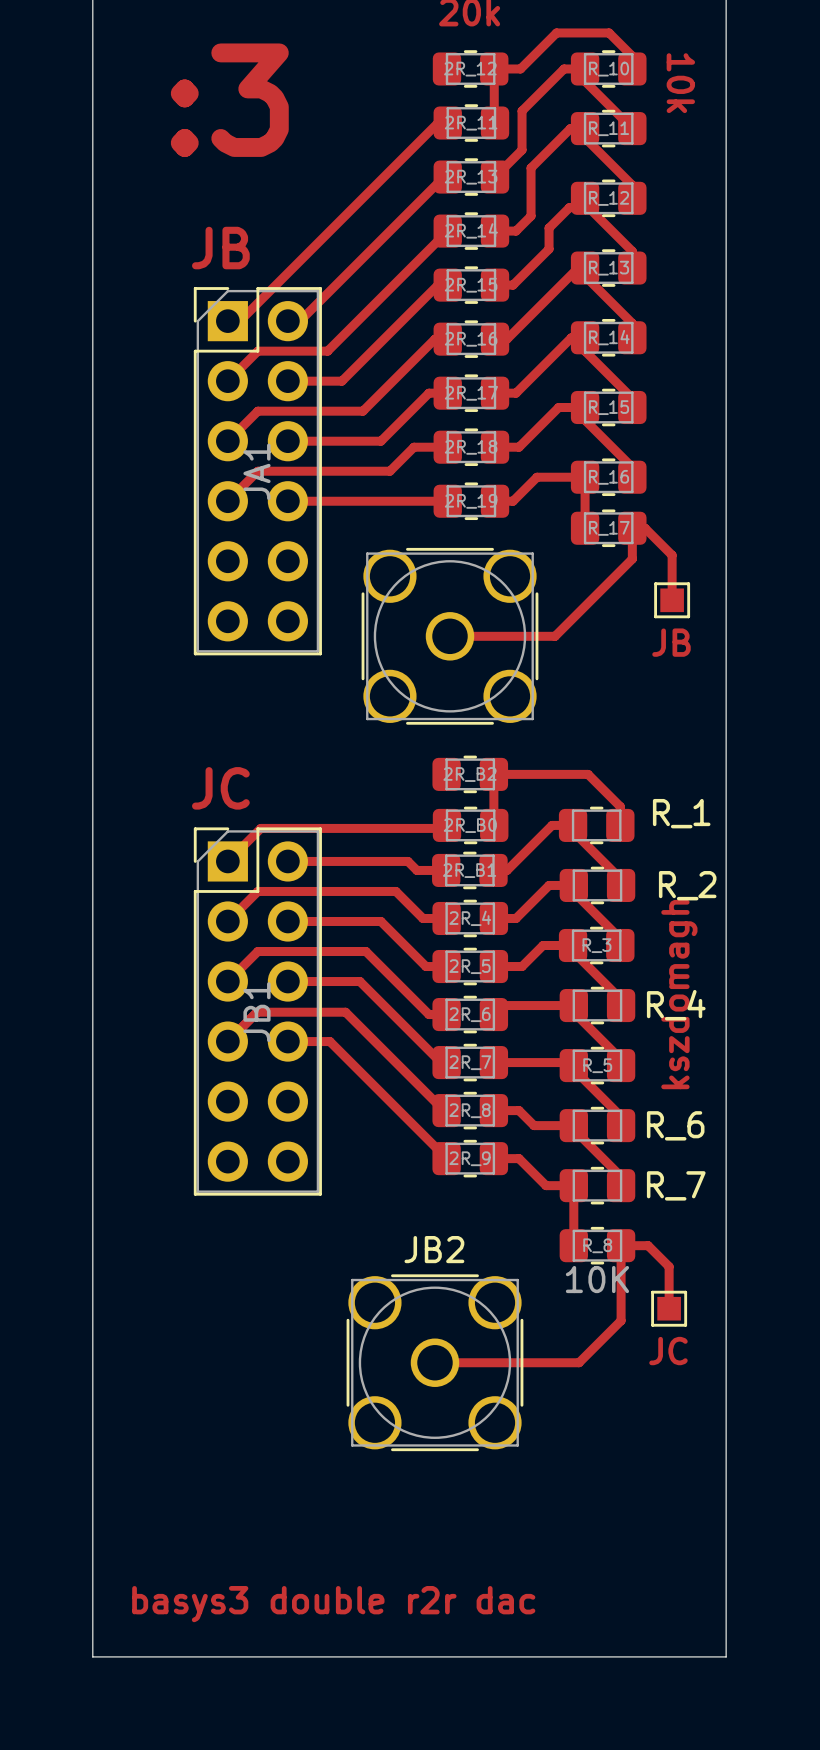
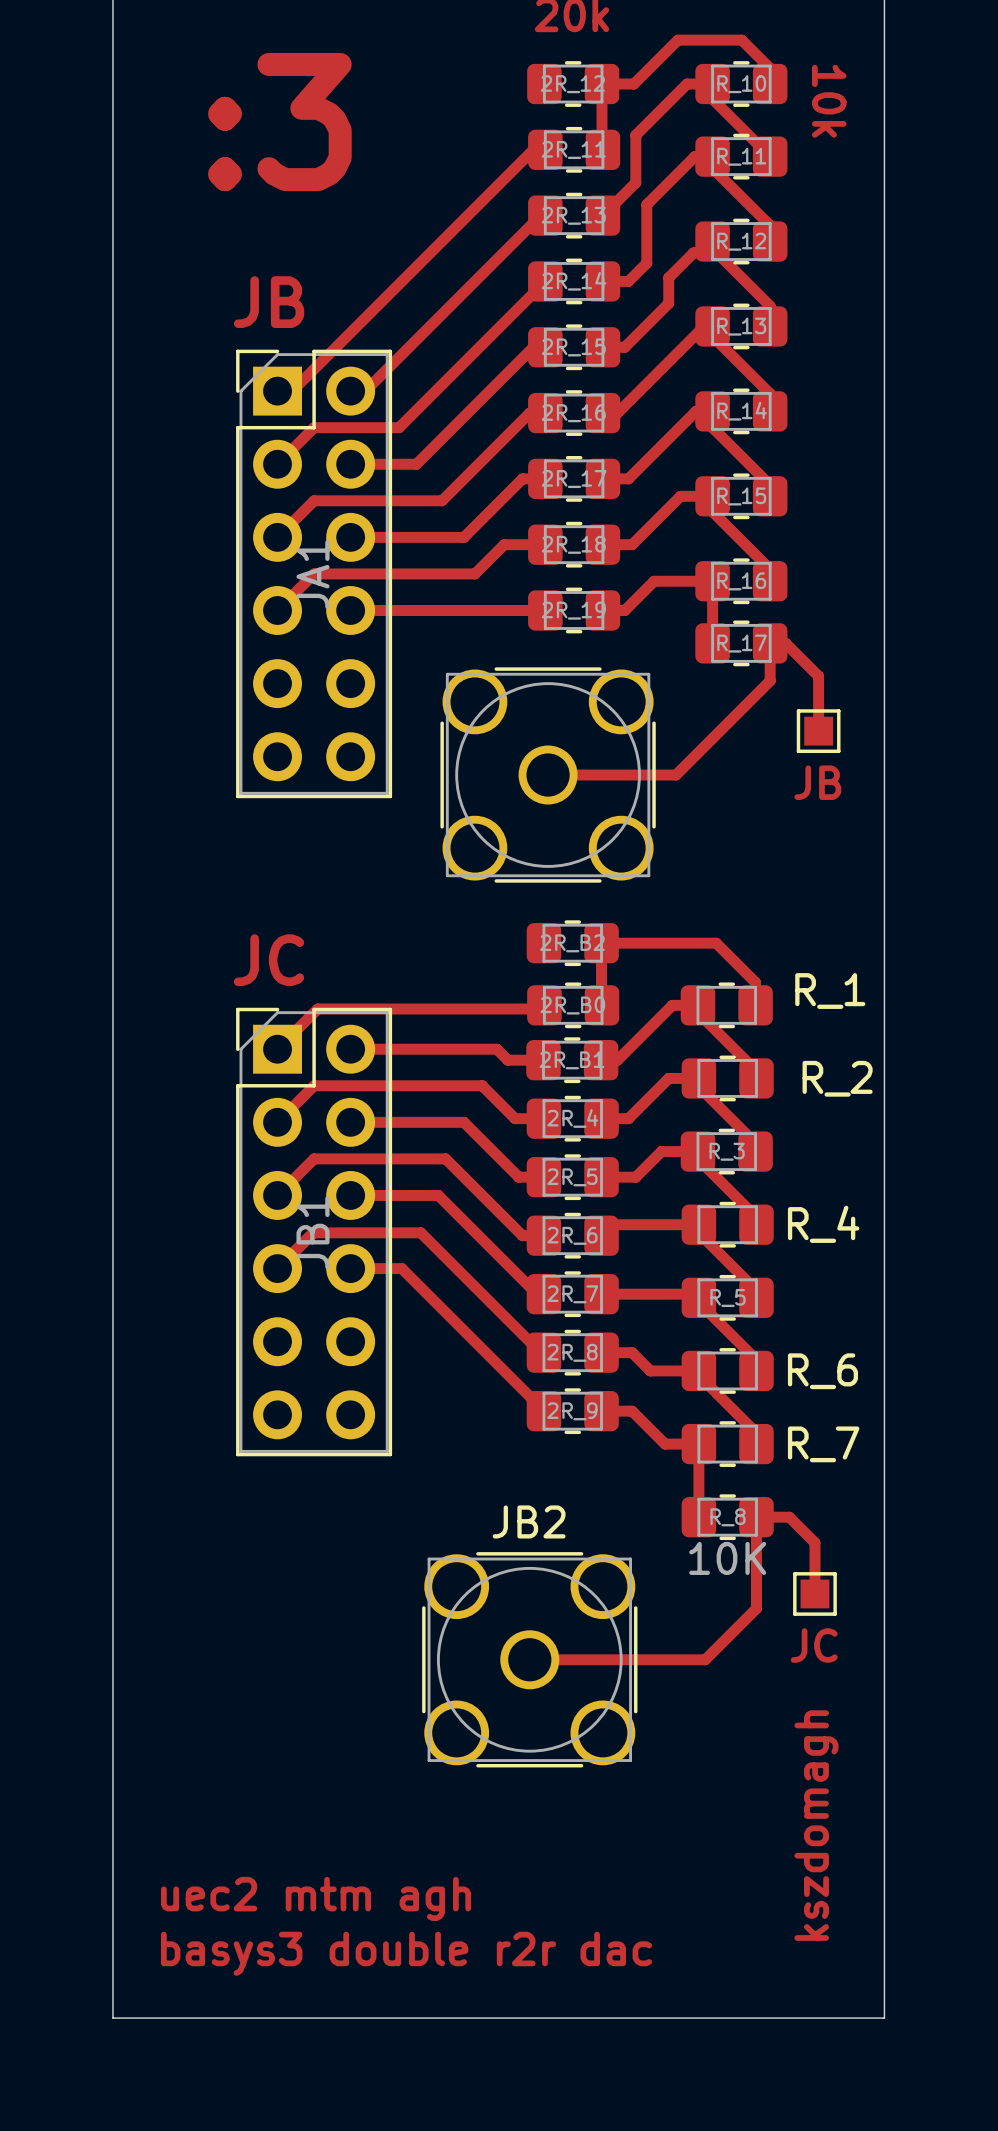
text position: kszdomagh (679, 994) -> kszdomagh (816, 1825)
text: none -> uec2 mtm agh (316, 1898)

